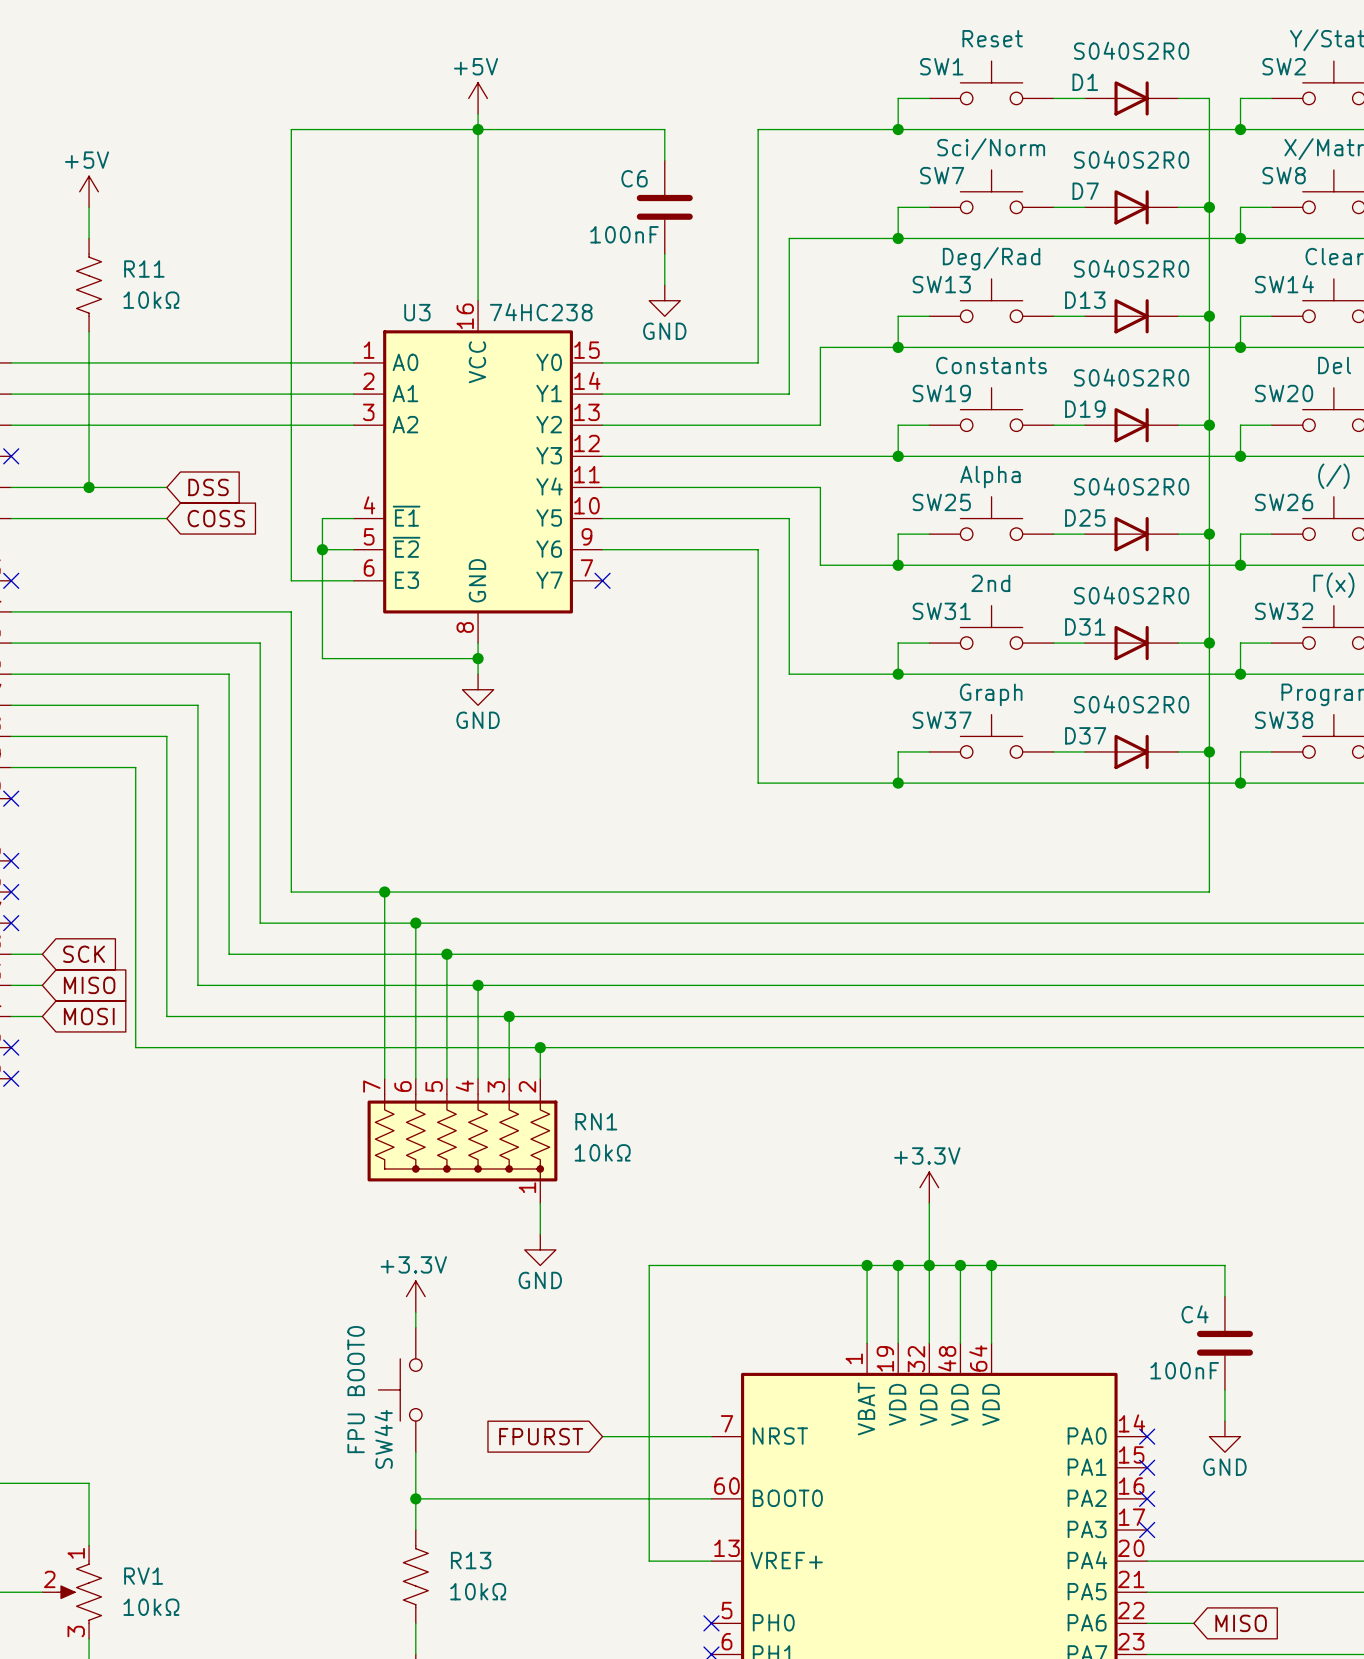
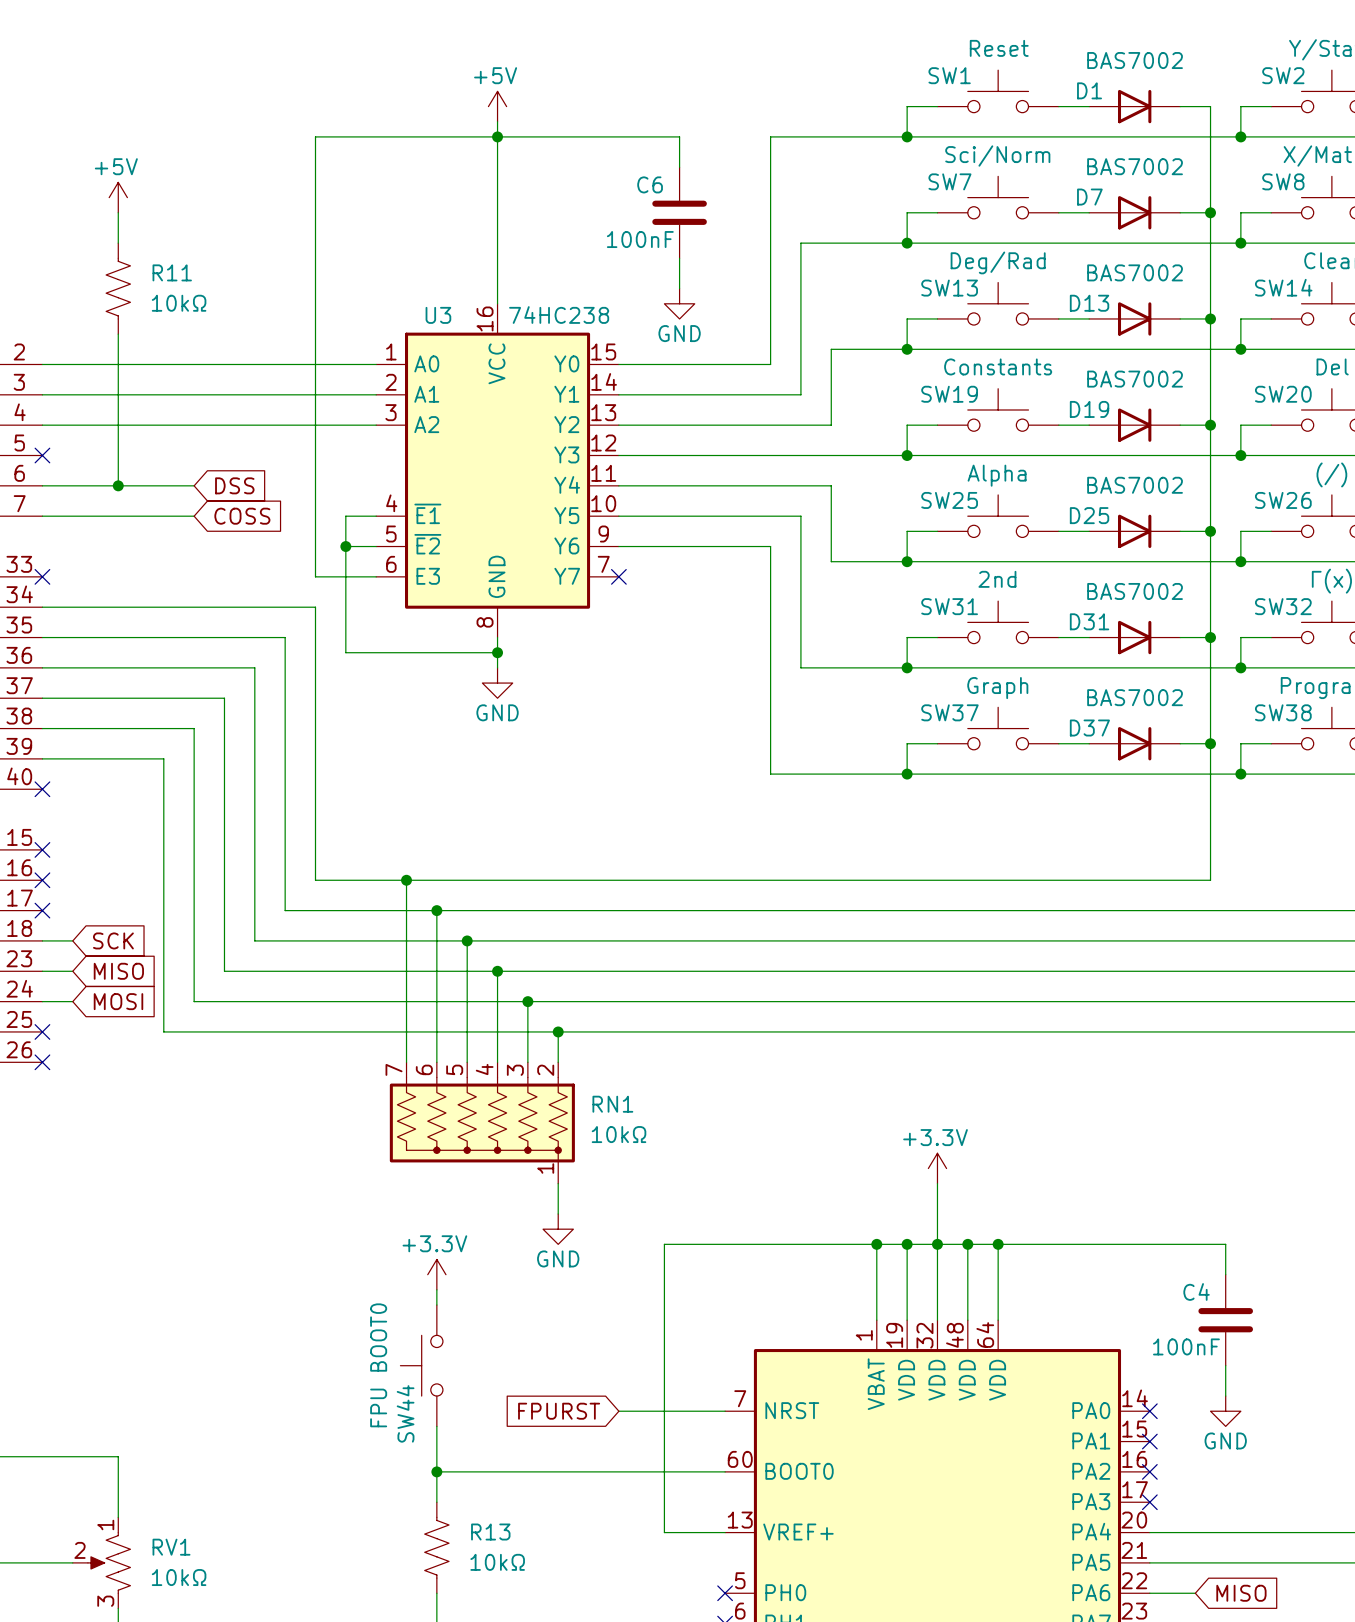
D1 value: S040S2R0 (1131, 50) -> BAS7002 (1135, 60)
D7 value: S040S2R0 (1131, 159) -> BAS7002 (1135, 166)
D13 value: S040S2R0 (1131, 268) -> BAS7002 (1135, 272)
D19 value: S040S2R0 (1131, 377) -> BAS7002 (1135, 379)
D25 value: S040S2R0 (1131, 486) -> BAS7002 (1135, 485)
D31 value: S040S2R0 (1131, 595) -> BAS7002 (1135, 591)
D37 value: S040S2R0 (1131, 704) -> BAS7002 (1135, 697)

